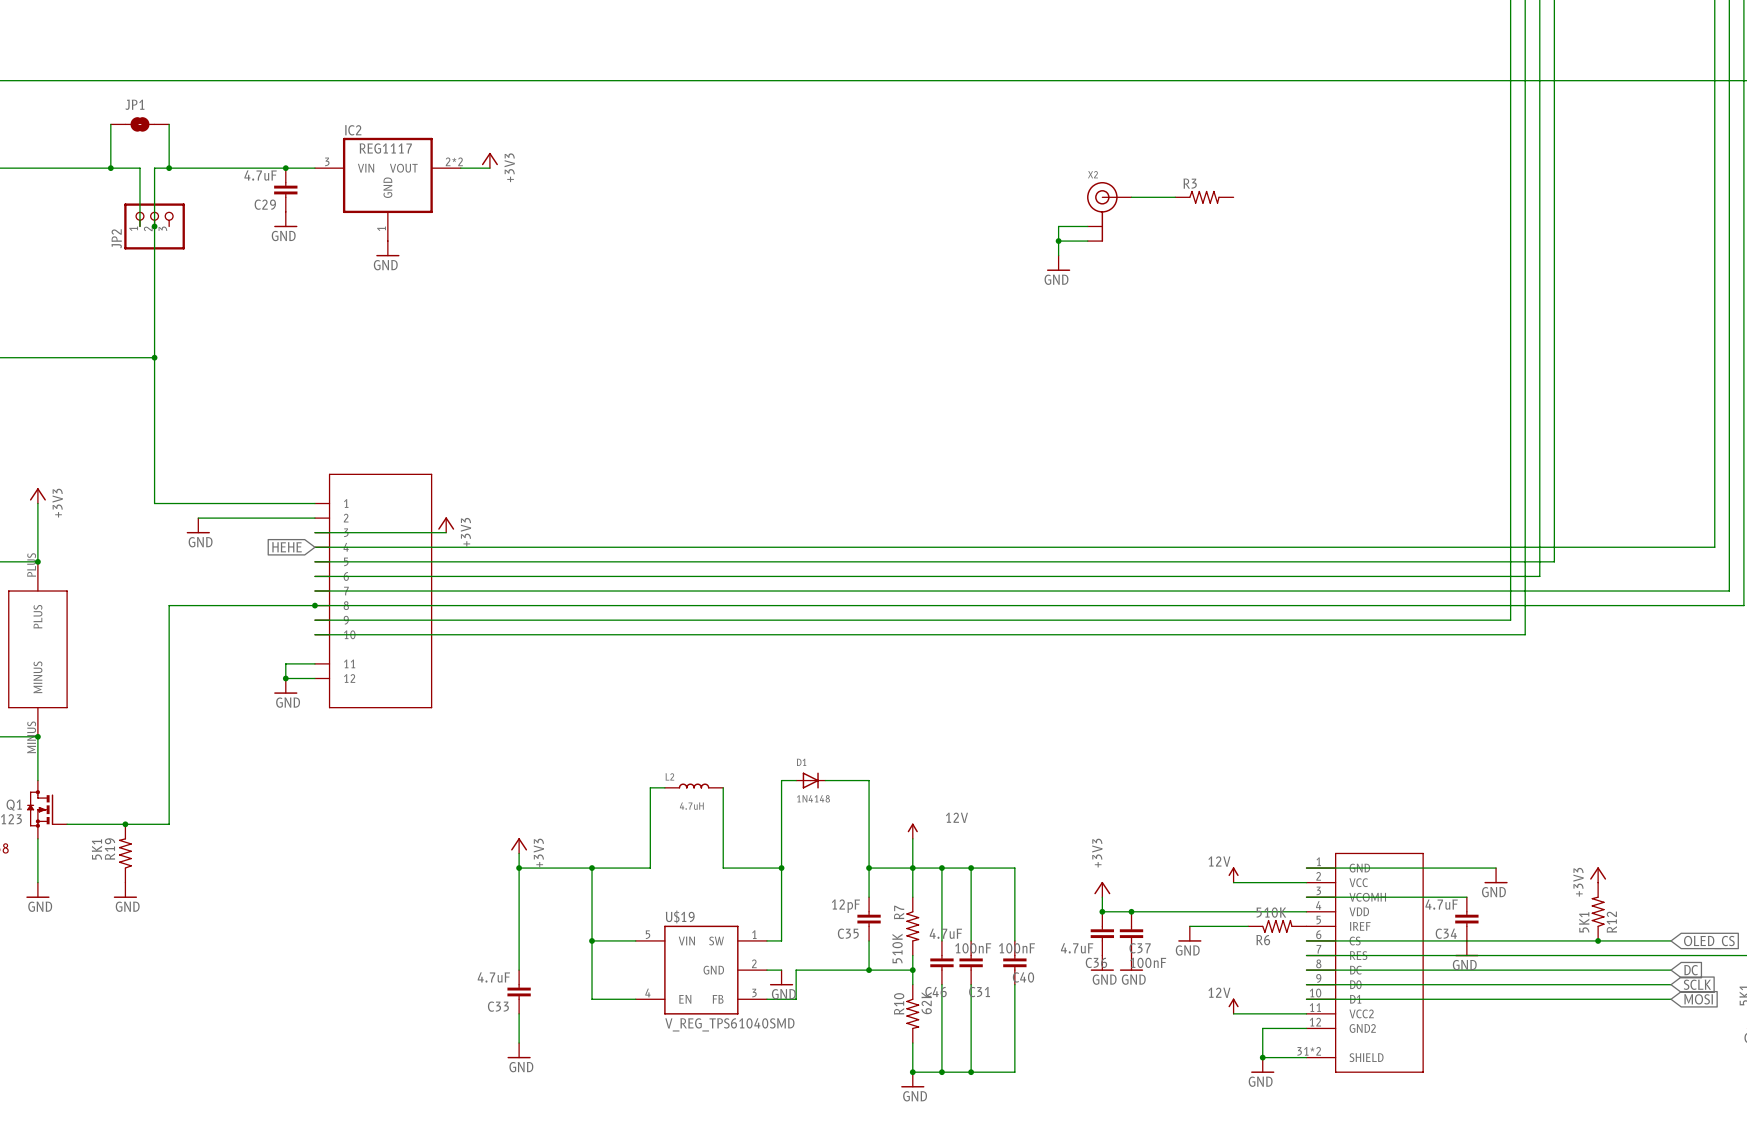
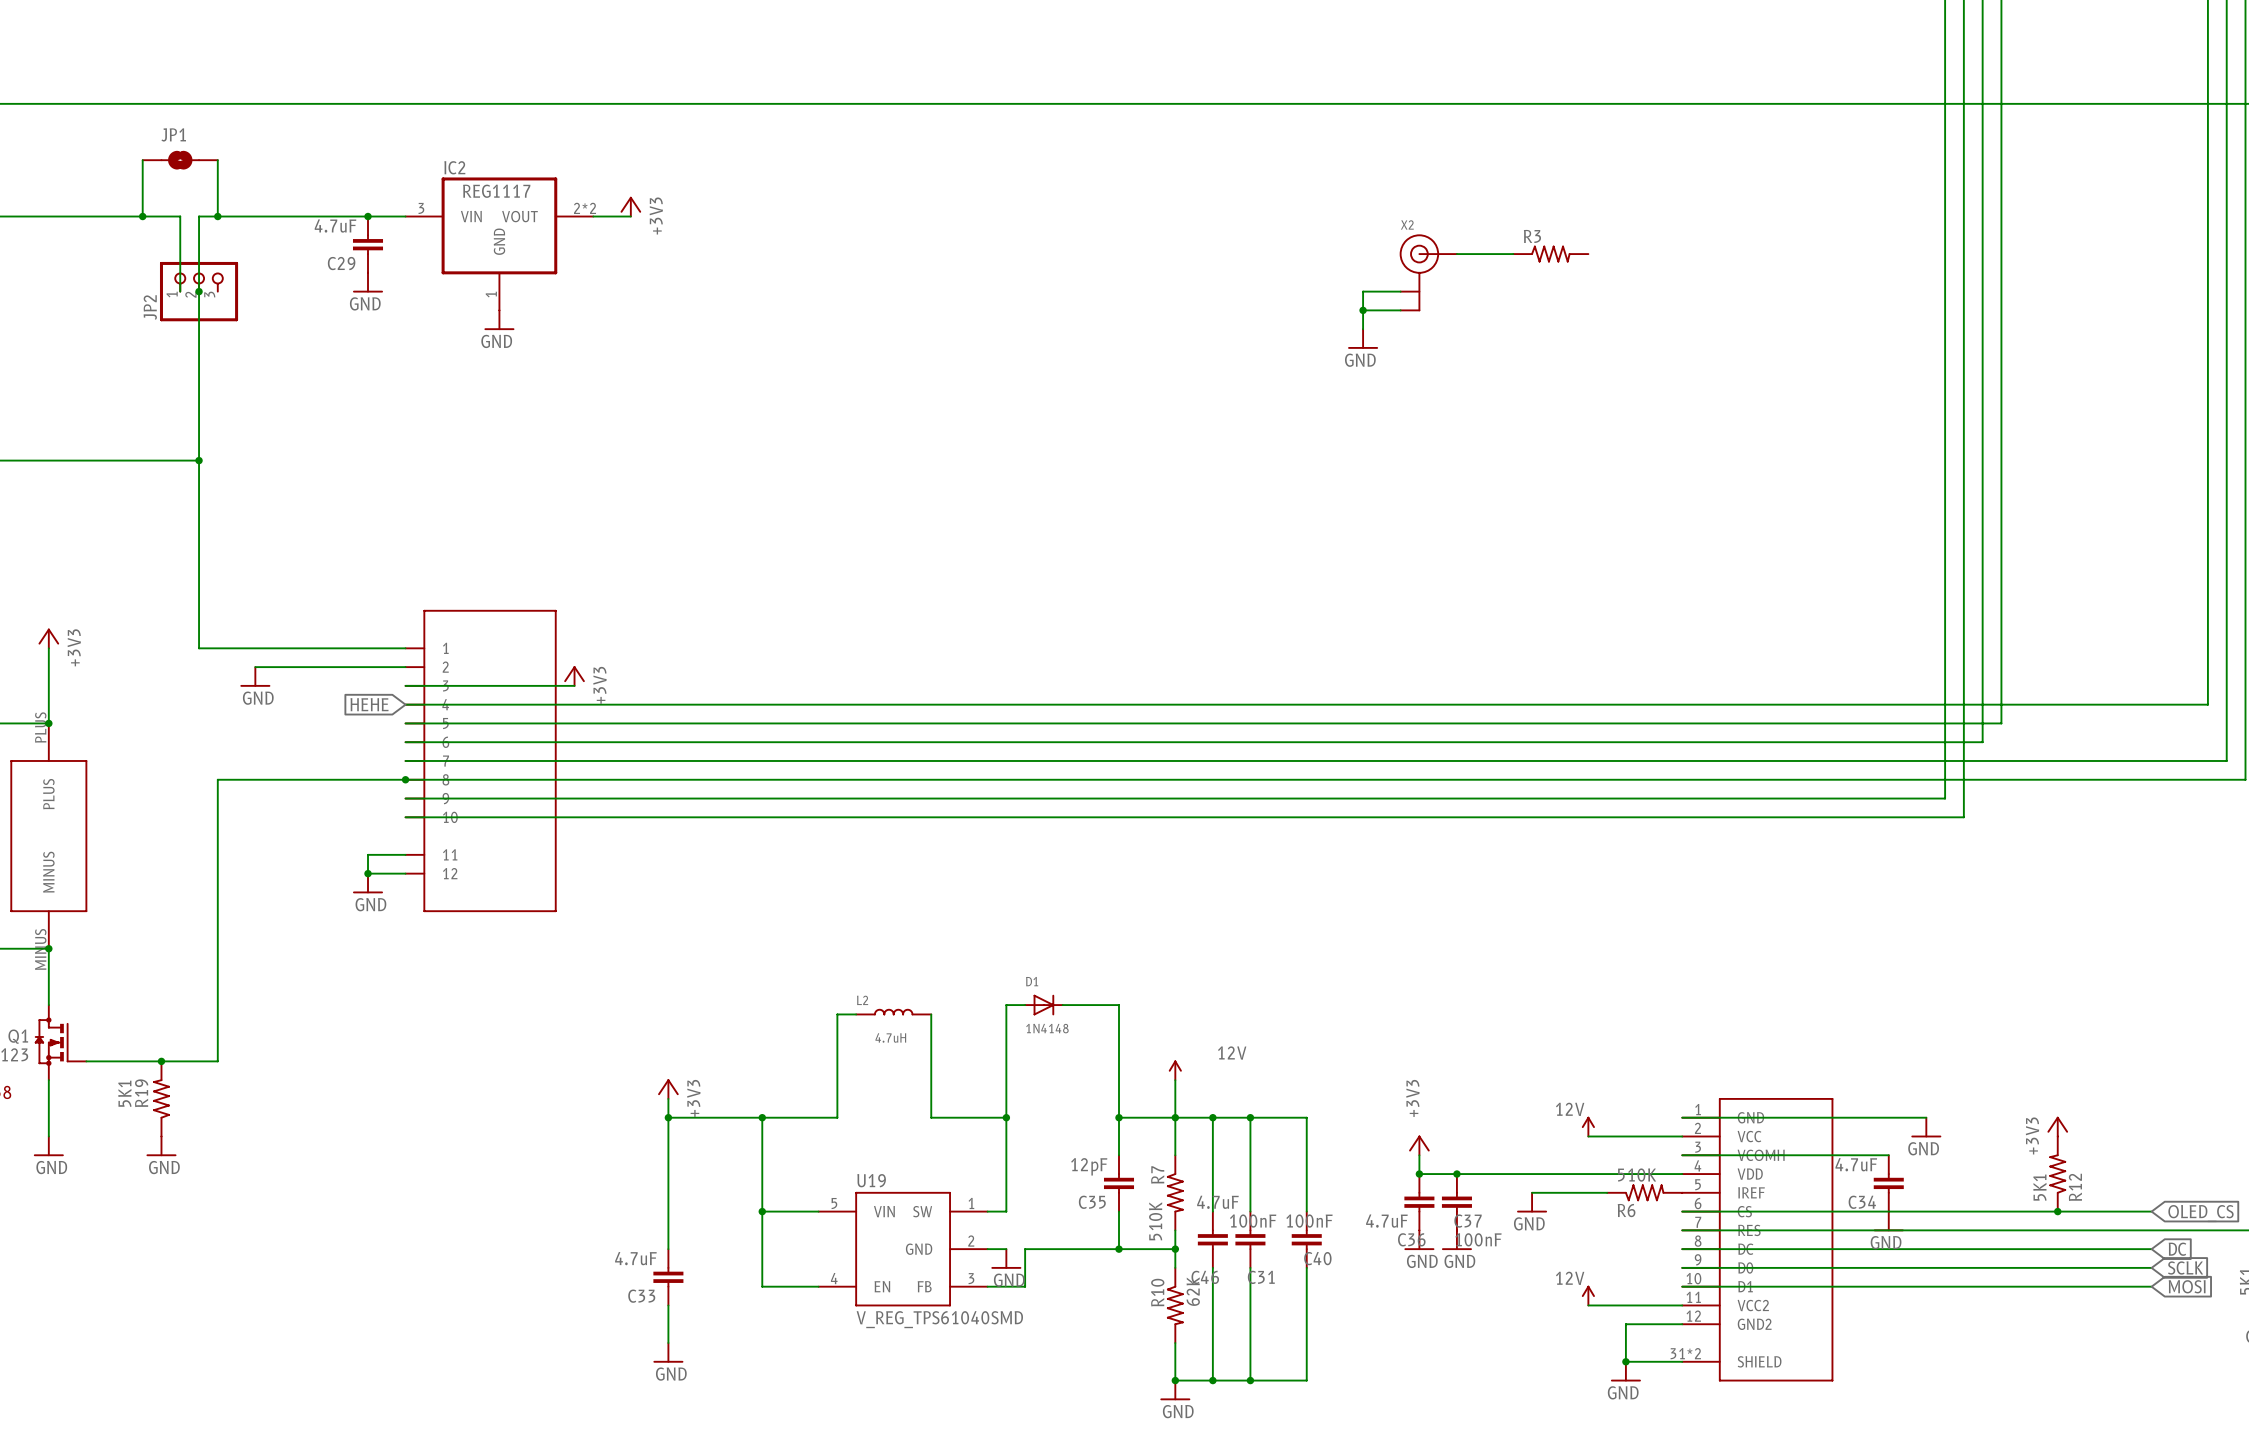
U$19 name: U$19 (680, 916) -> U19 (871, 1180)

